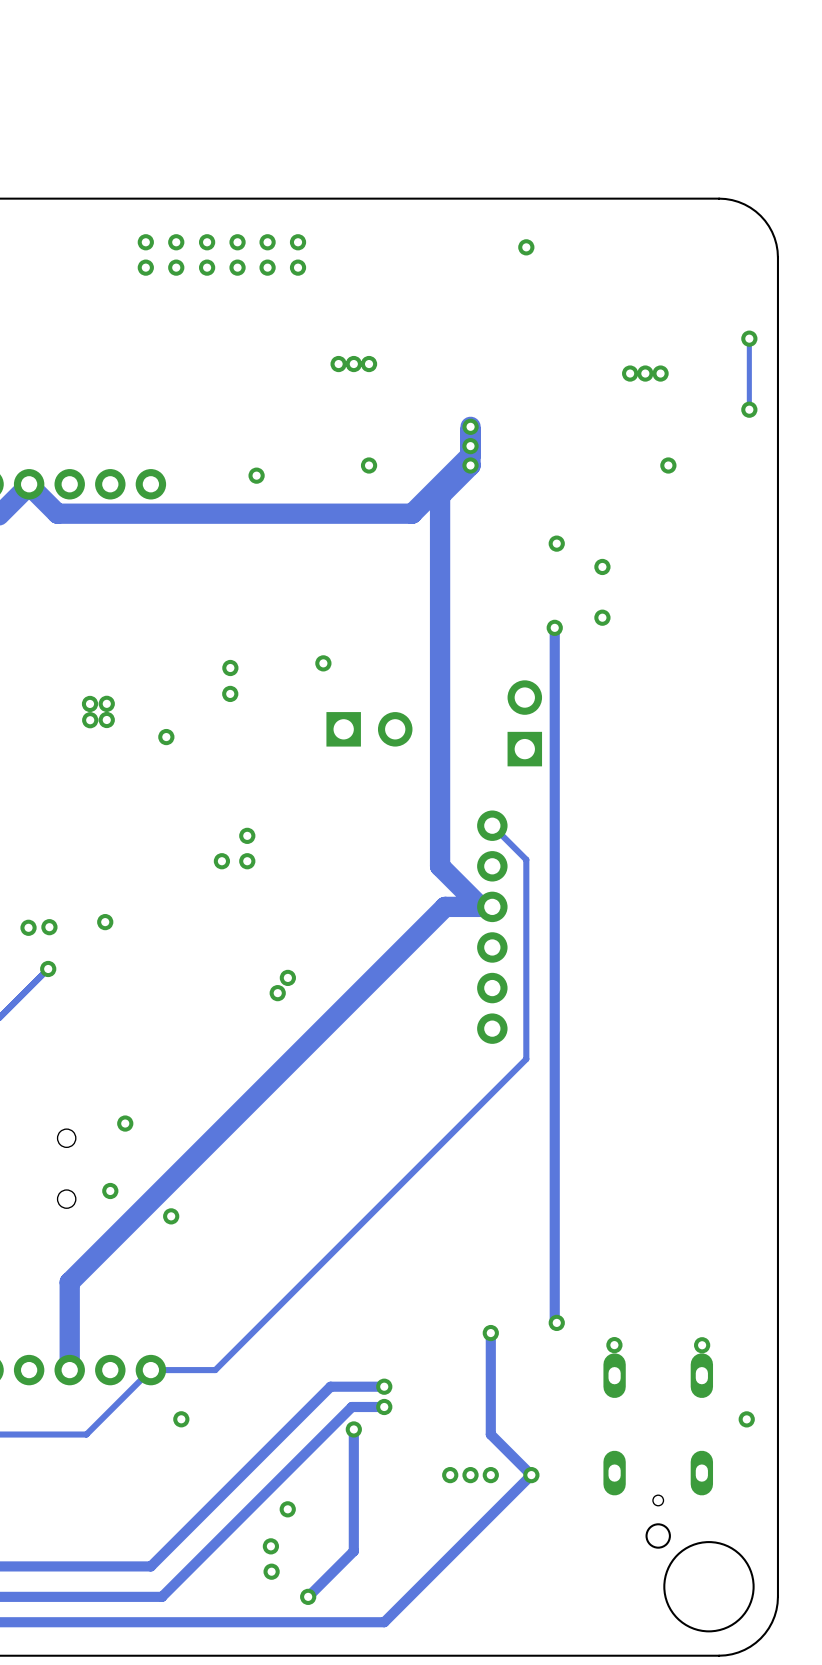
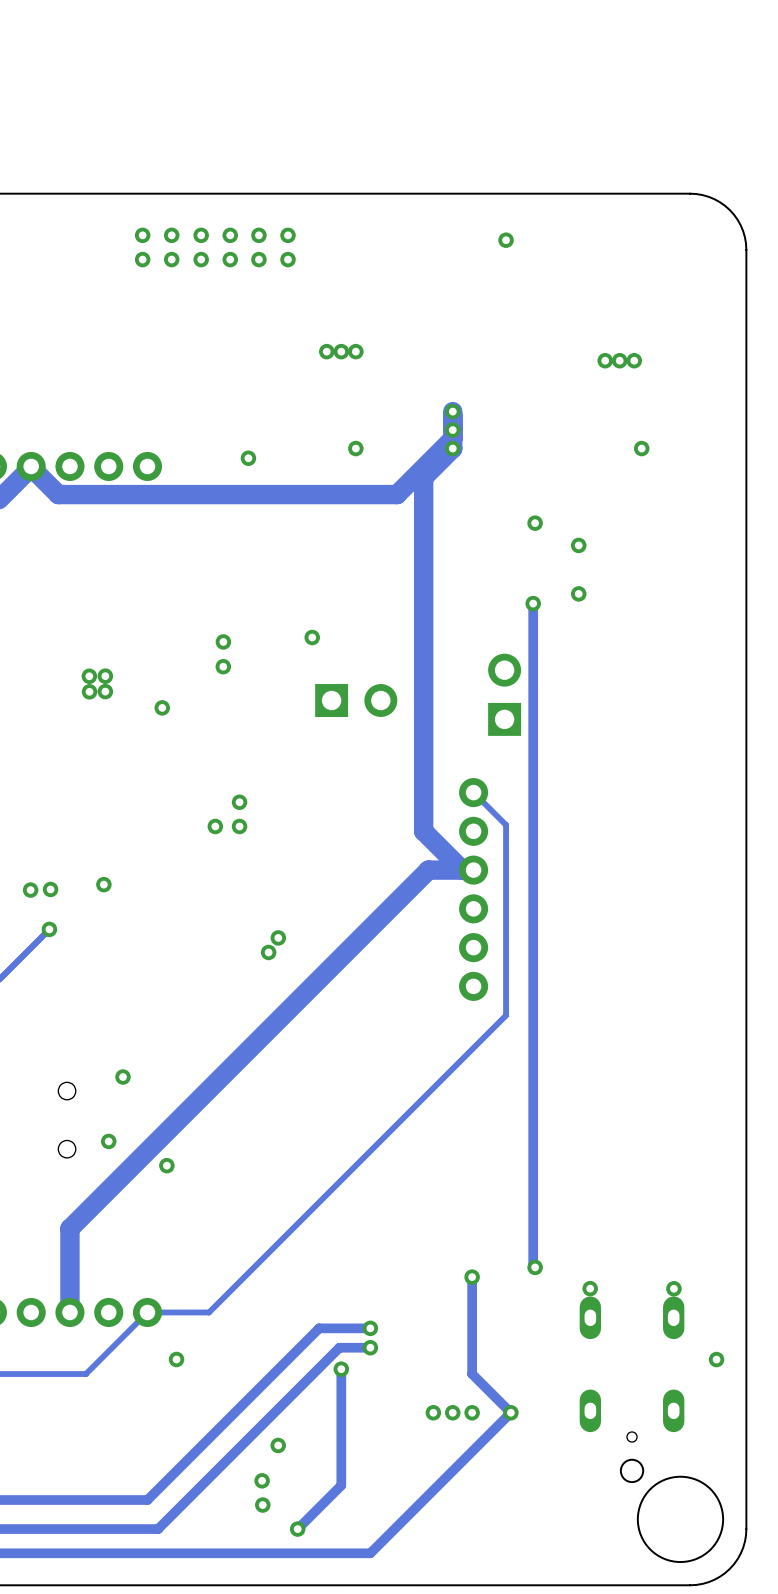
track: (749, 338) (749, 409) -> none
via: (749, 338) -> none
via: (749, 409) -> none

